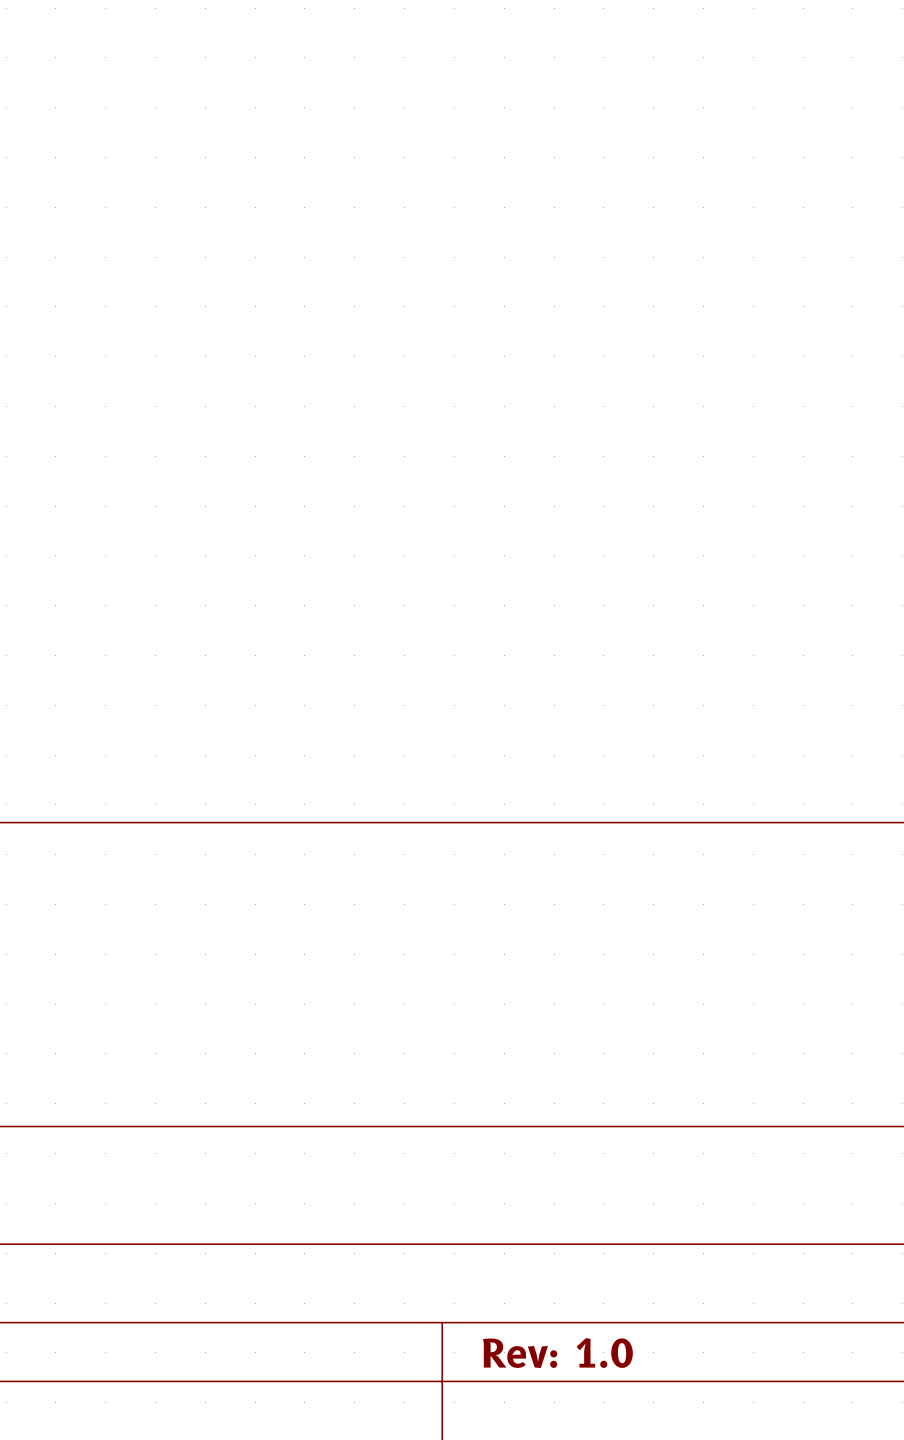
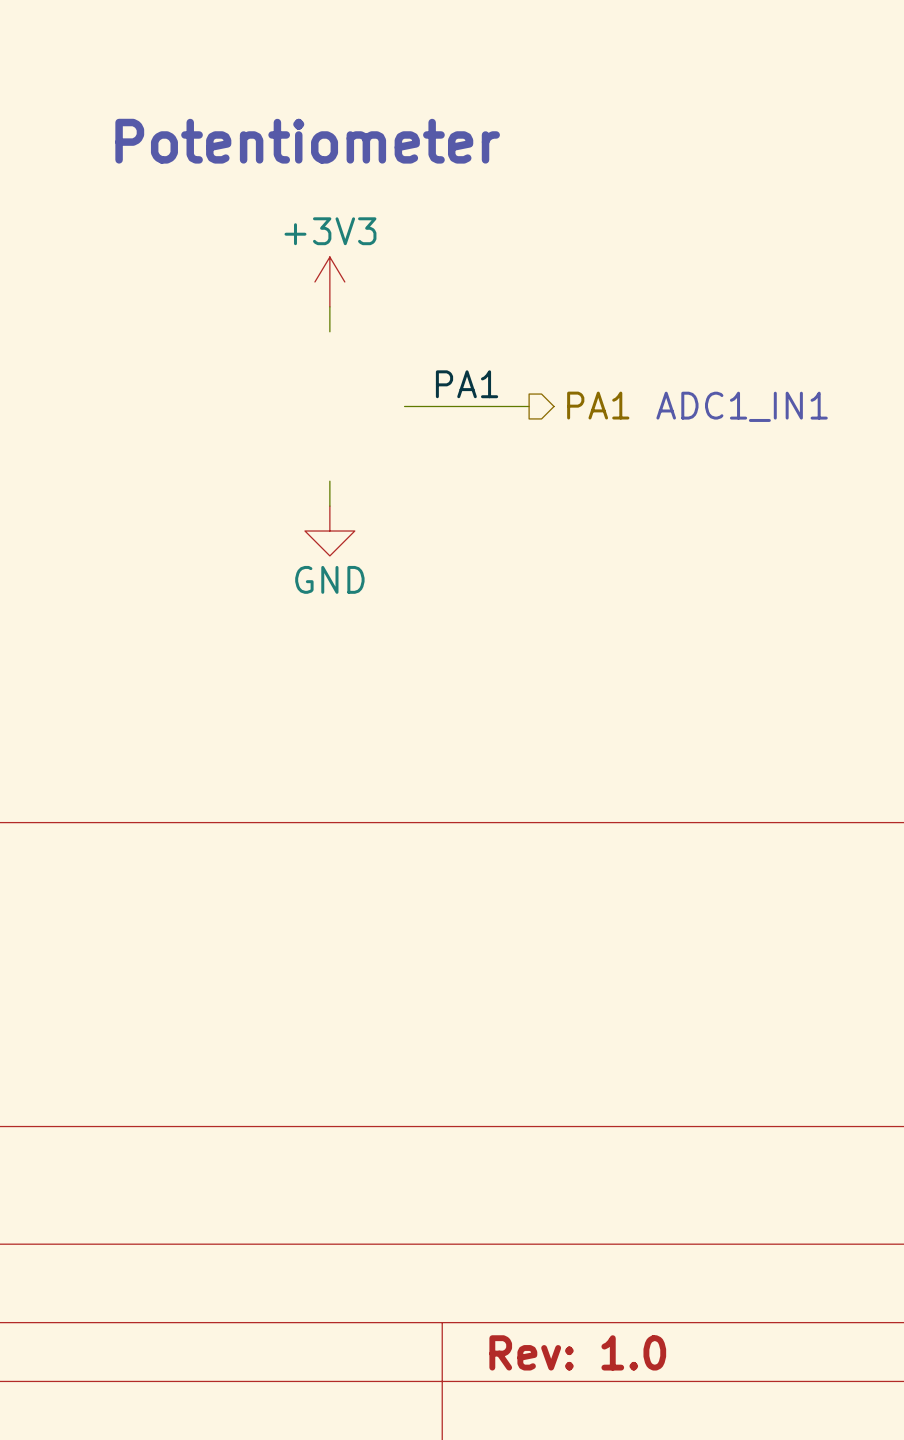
text: none -> Potentiometer (307, 141)
power symbol: none -> +3V3 (329, 281)
wire: none -> (329, 306) (329, 331)
label: none -> PA1 (467, 384)
hierarchical label: none -> PA1 (598, 405)
wire: none -> (404, 406) (529, 406)
text: none -> ADC1_IN1 (742, 406)
wire: none -> (329, 481) (329, 506)
power symbol: none -> GND (329, 531)

